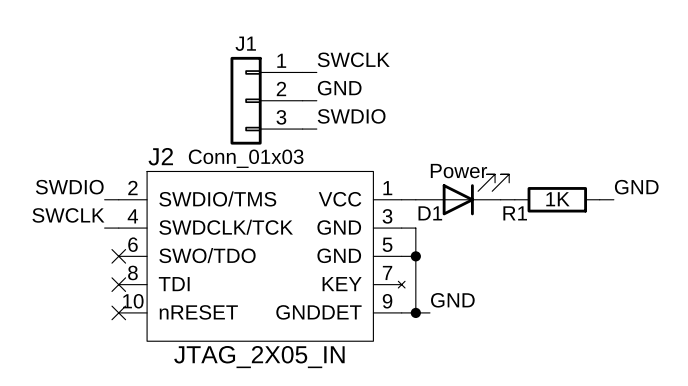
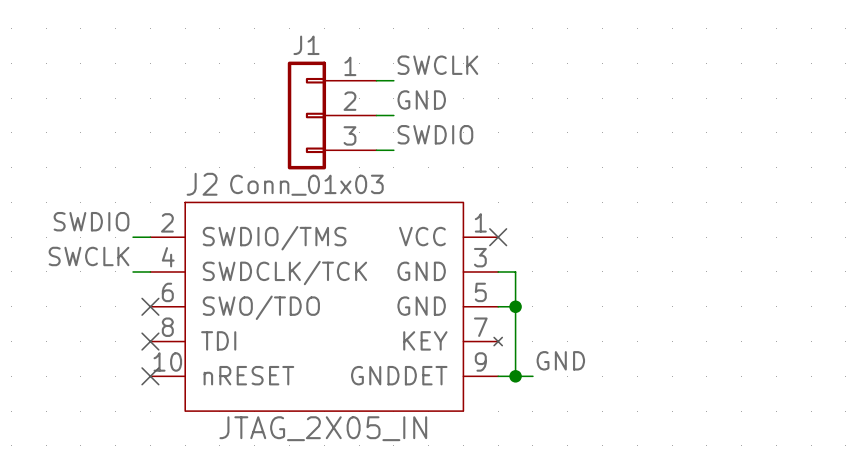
label: GND (636, 187) -> none
D1: Power (462, 194) -> none
wire: (401, 199) (415, 199) -> none
no-connect mark: none -> (498, 237)
wire: (500, 199) (514, 199) -> none
R1: 1K (557, 199) -> none
wire: (599, 199) (613, 199) -> none

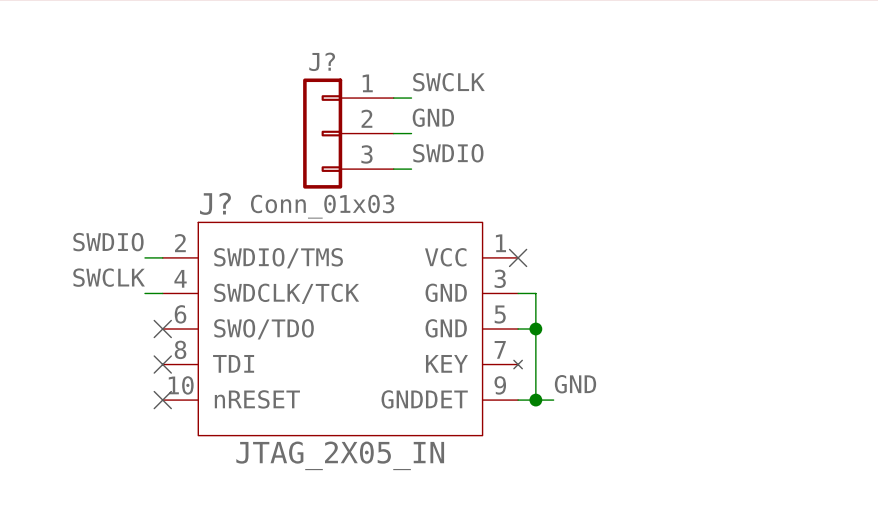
J1 name: J1 (306, 45) -> J? (322, 61)
J2 name: J2 (202, 184) -> J? (215, 203)

